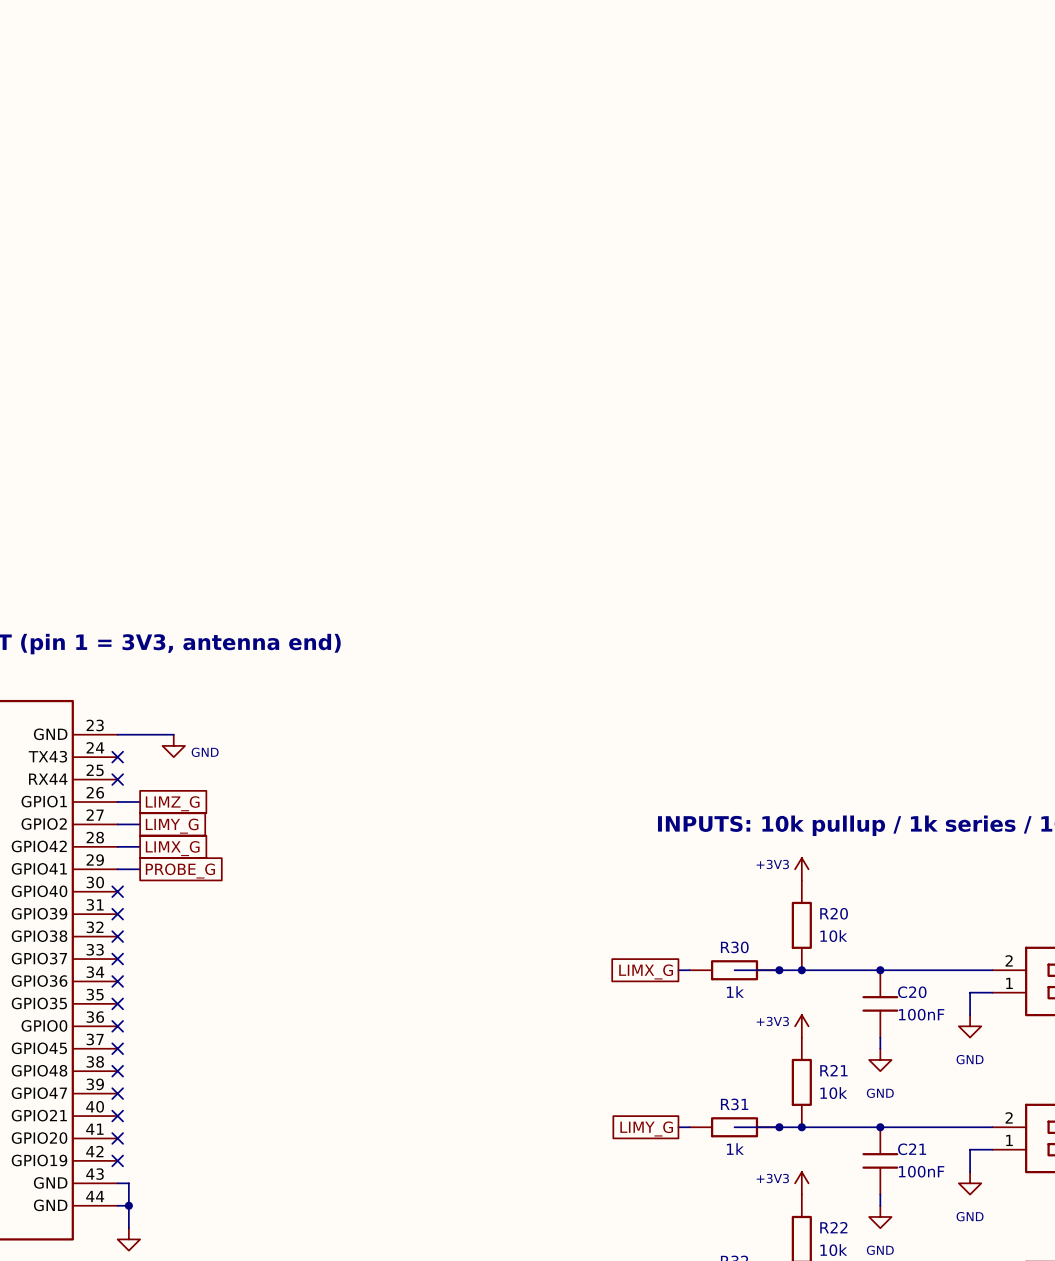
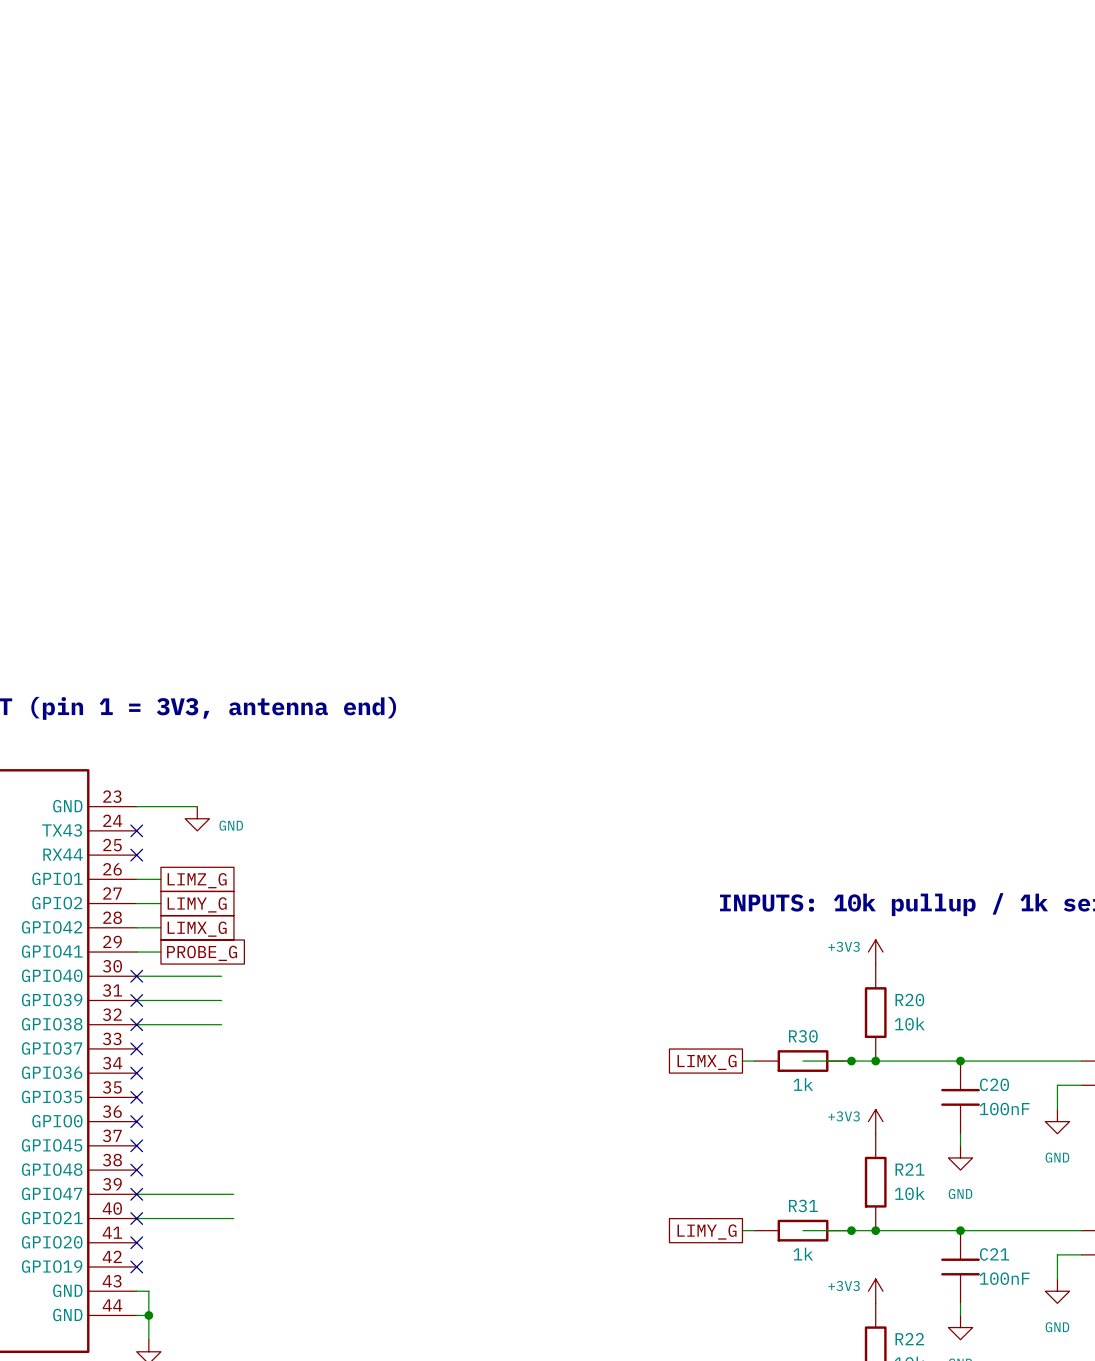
wire: none -> (136, 976) (221, 976)
wire: none -> (136, 1000) (221, 1000)
wire: none -> (136, 1024) (221, 1024)
wire: none -> (136, 1194) (233, 1194)
wire: none -> (136, 1218) (233, 1218)

